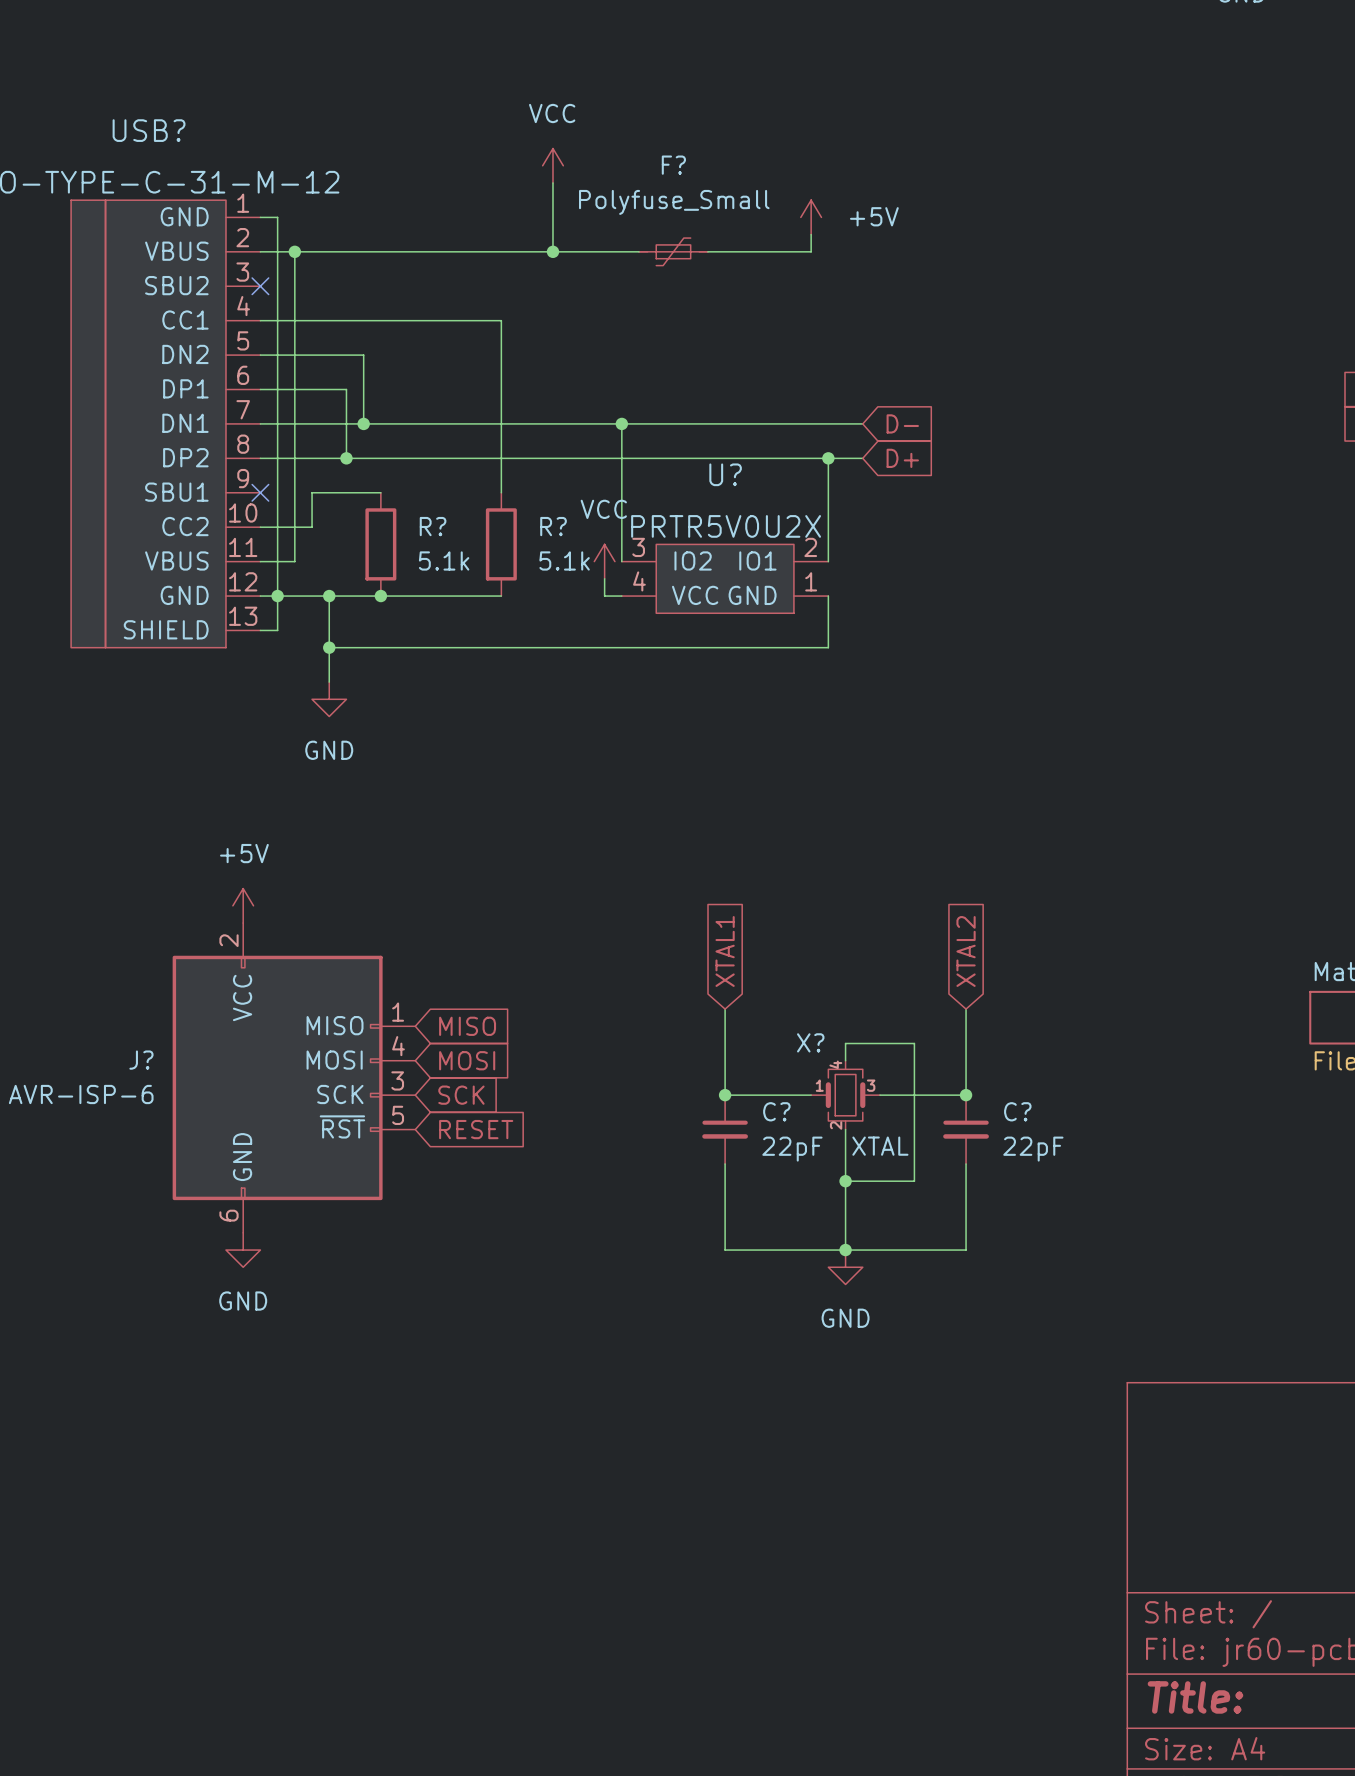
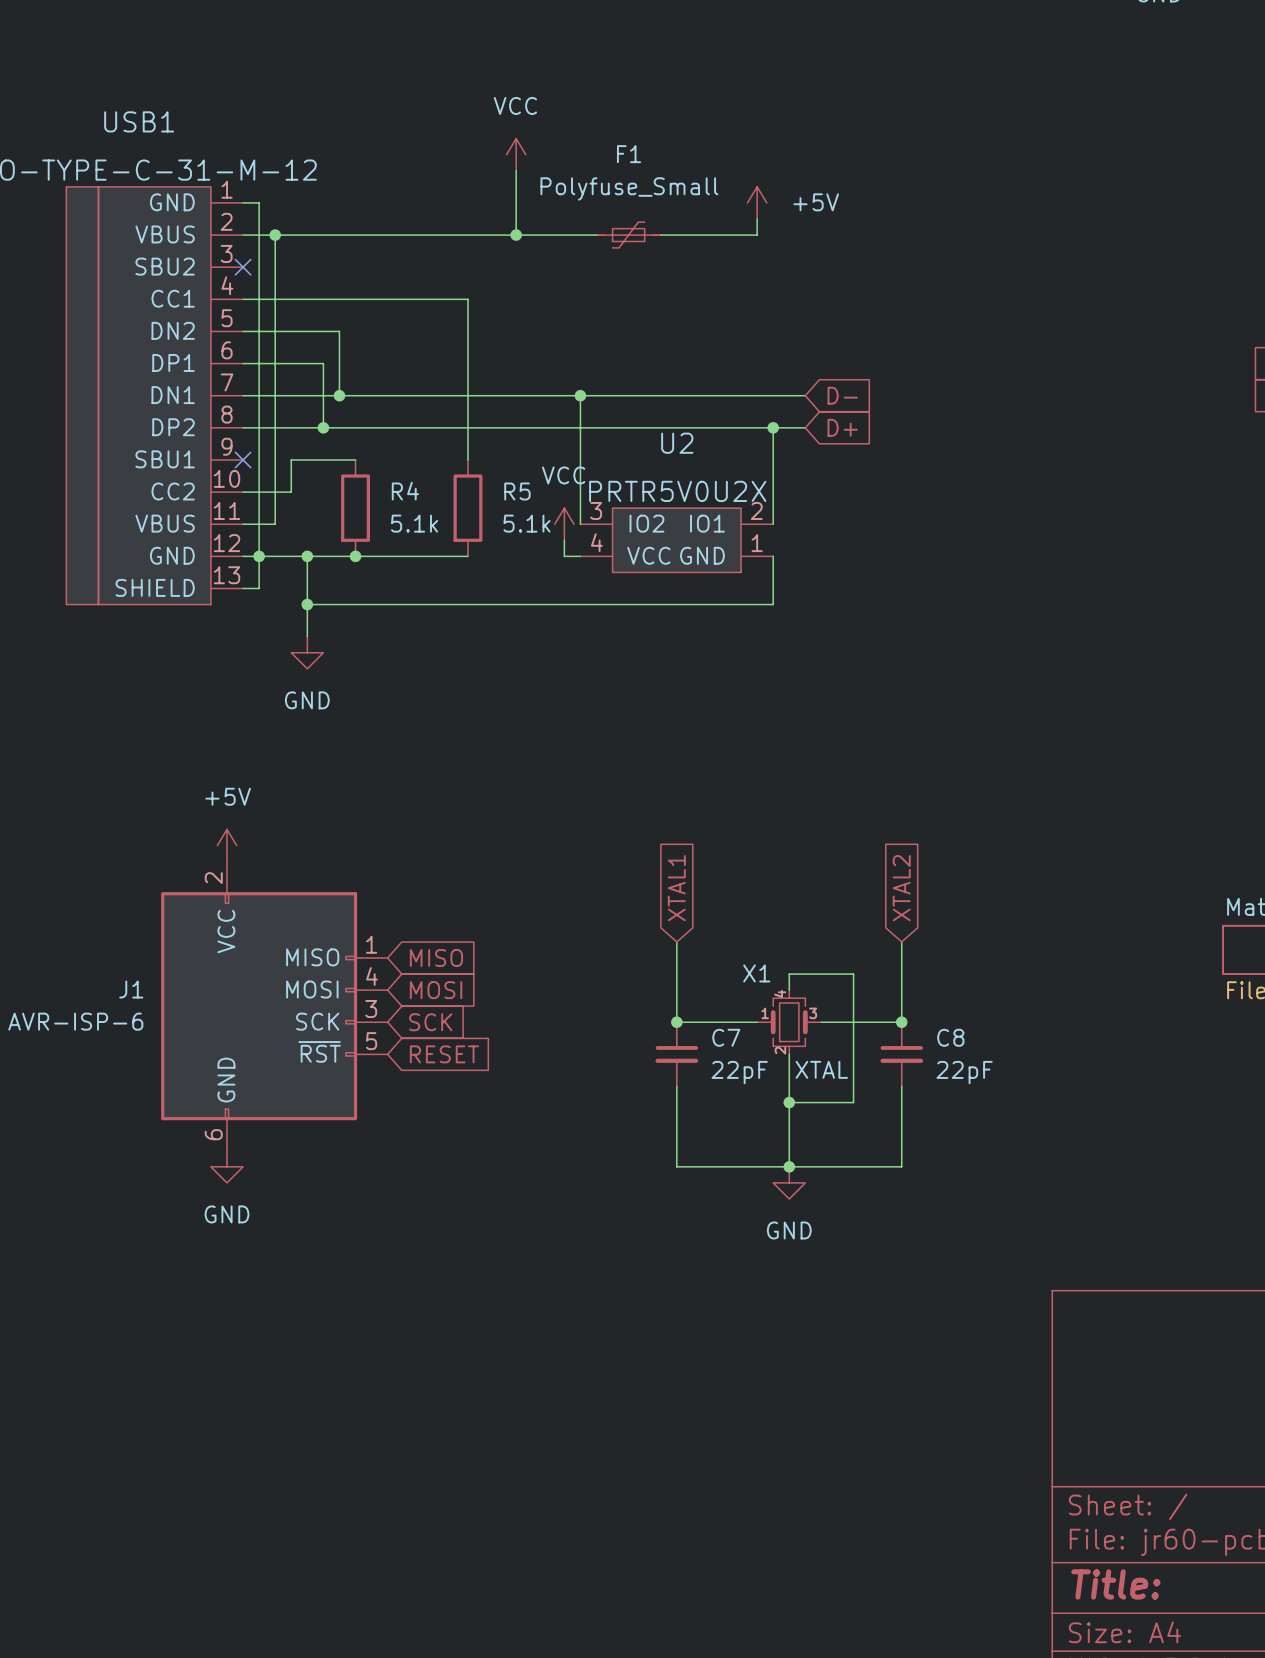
USB? name: USB? (149, 130) -> USB1 (139, 121)
F? name: F? (673, 165) -> F1 (629, 154)
U? name: U? (725, 474) -> U2 (677, 443)
R? name: R? (433, 526) -> R4 (405, 491)
R? name: R? (553, 526) -> R5 (517, 491)
X? name: X? (810, 1042) -> X1 (756, 973)
J? name: J? (141, 1060) -> J1 (131, 989)
C? name: C? (776, 1111) -> C7 (726, 1037)
C? name: C? (1017, 1111) -> C8 (950, 1037)

